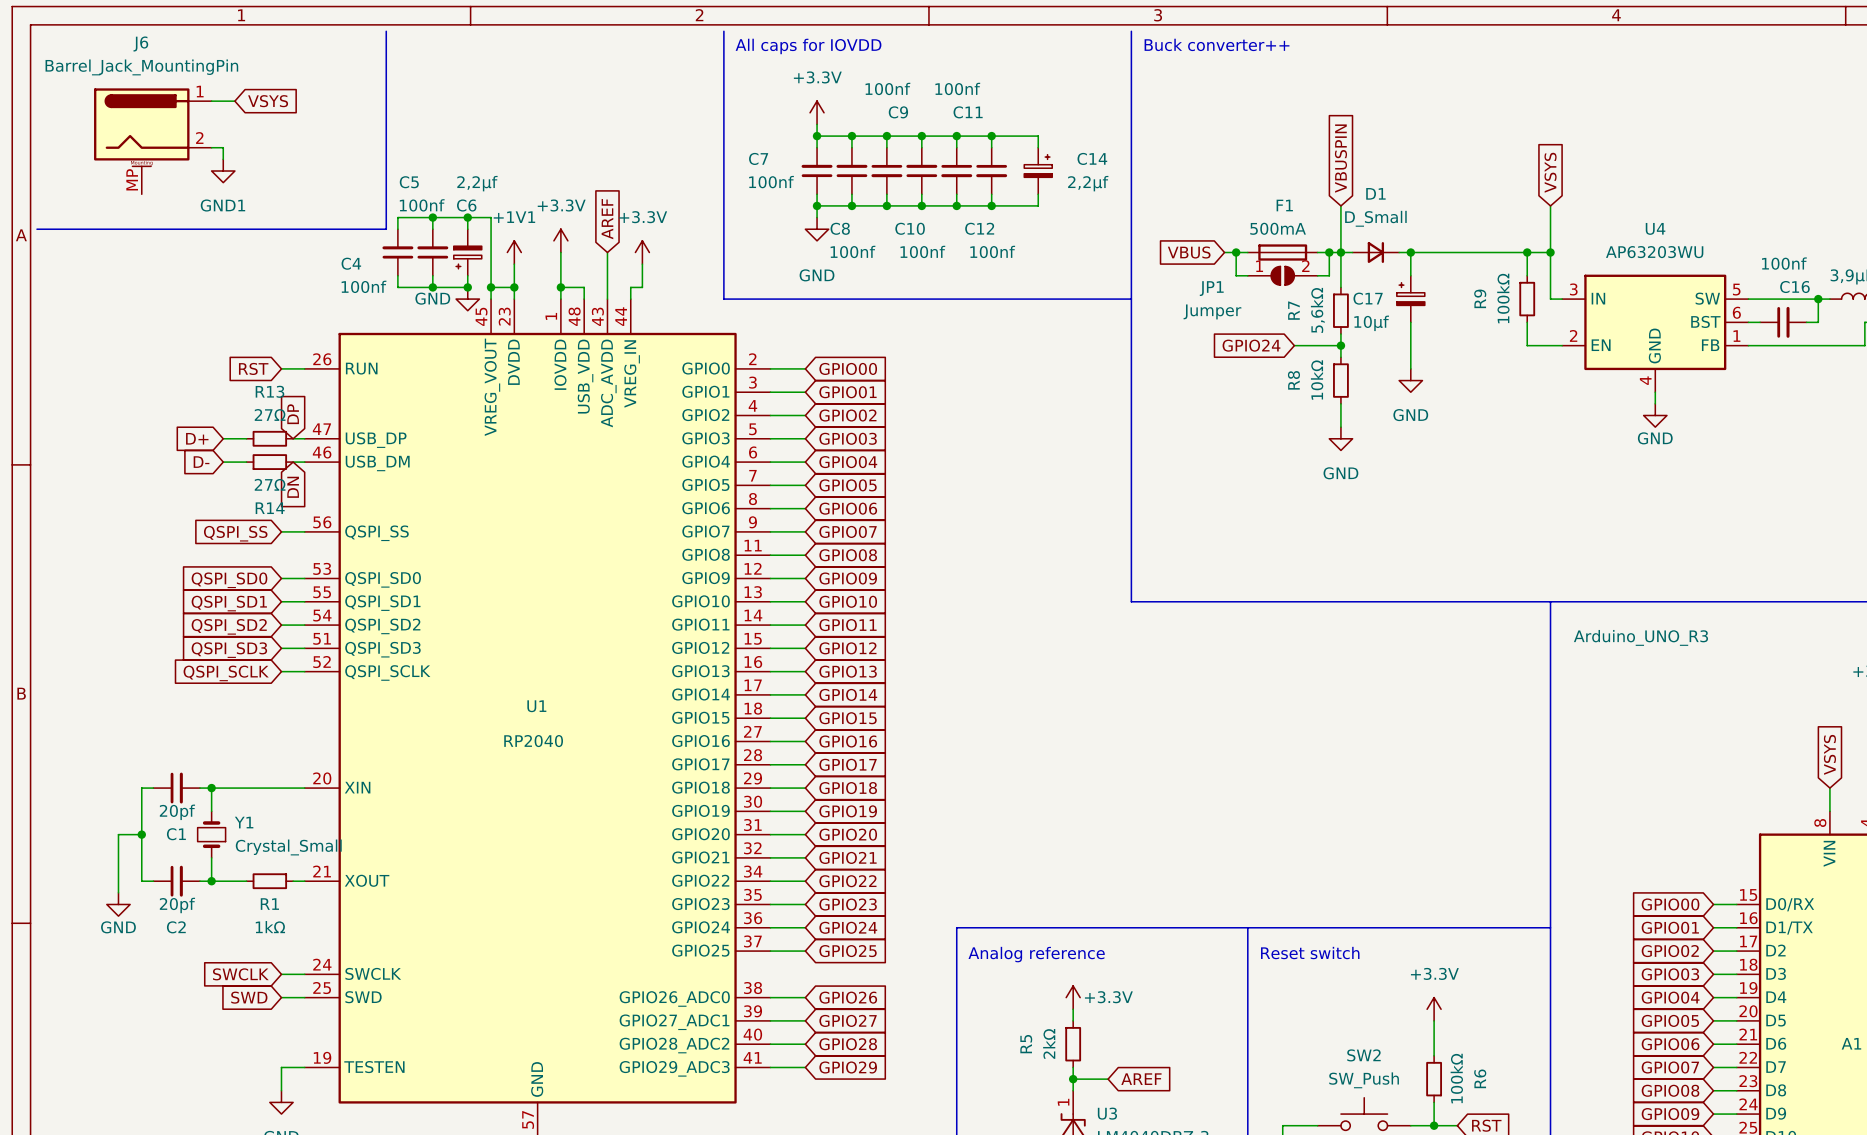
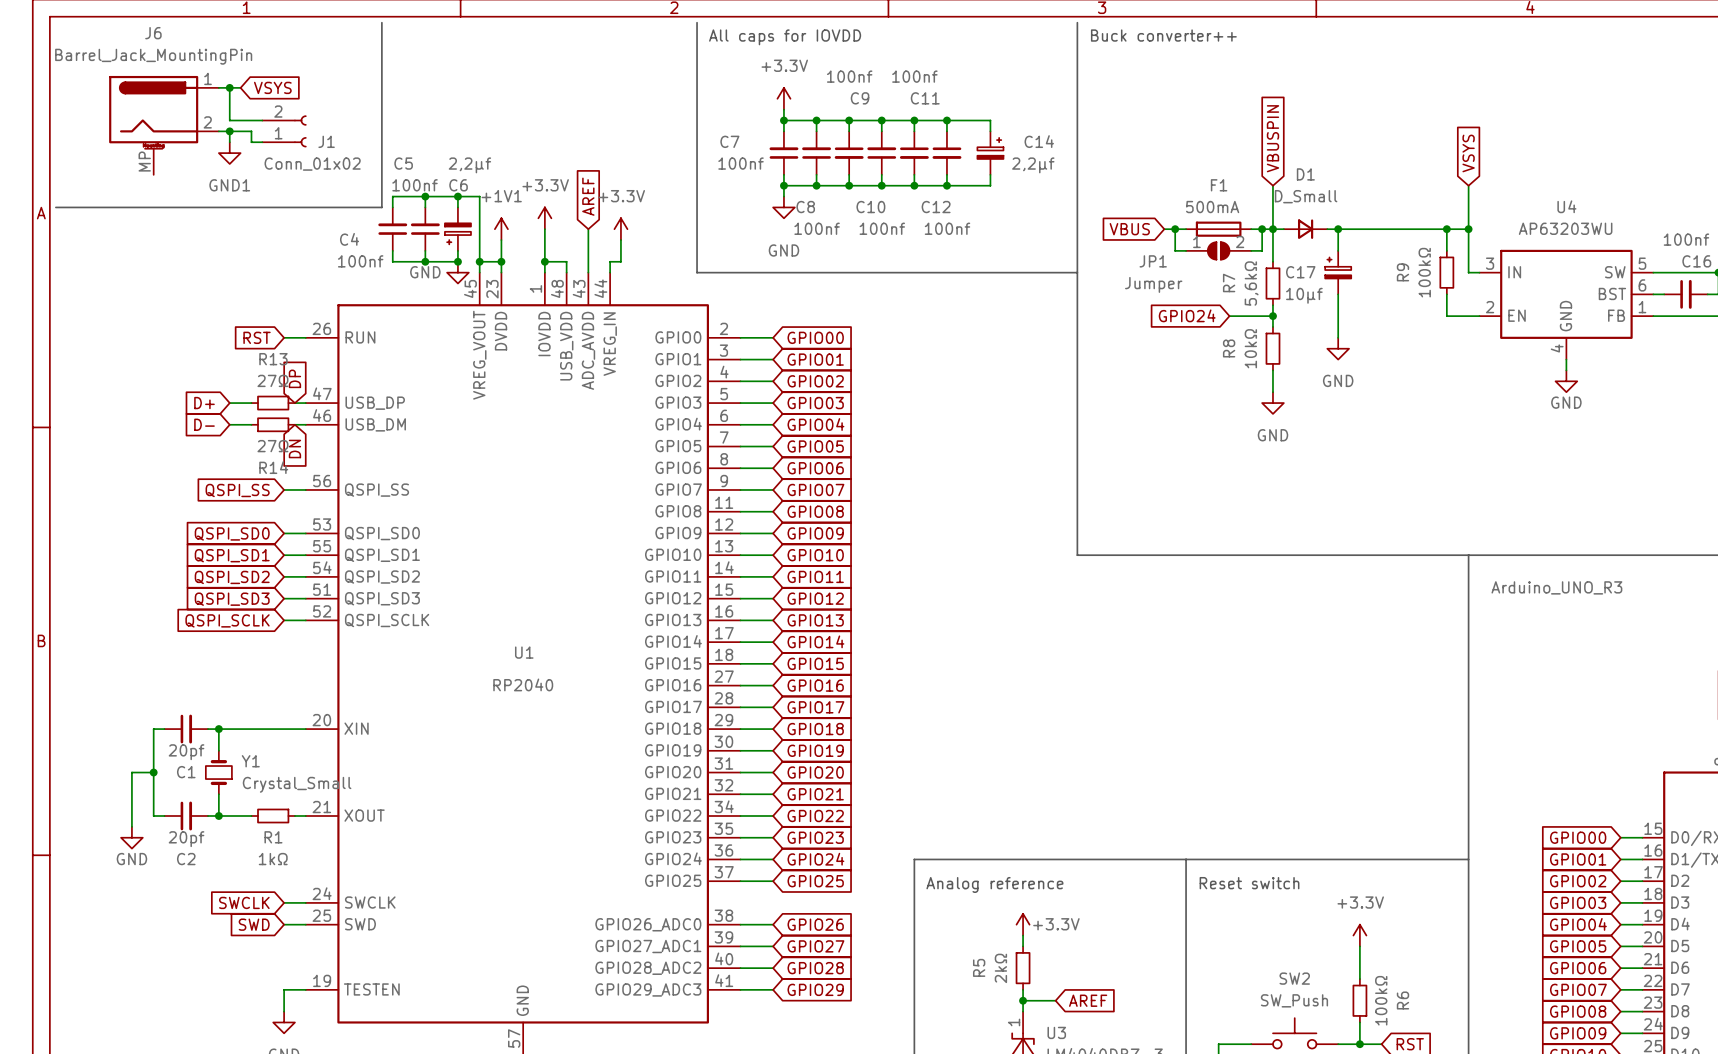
wire: none -> (229, 87) (229, 120) (262, 120)
junction: none -> (229, 87)
wire: none -> (229, 131) (251, 131) (251, 142) (262, 142)
junction: none -> (229, 131)
J1: none -> Conn_01x02 (284, 131)

